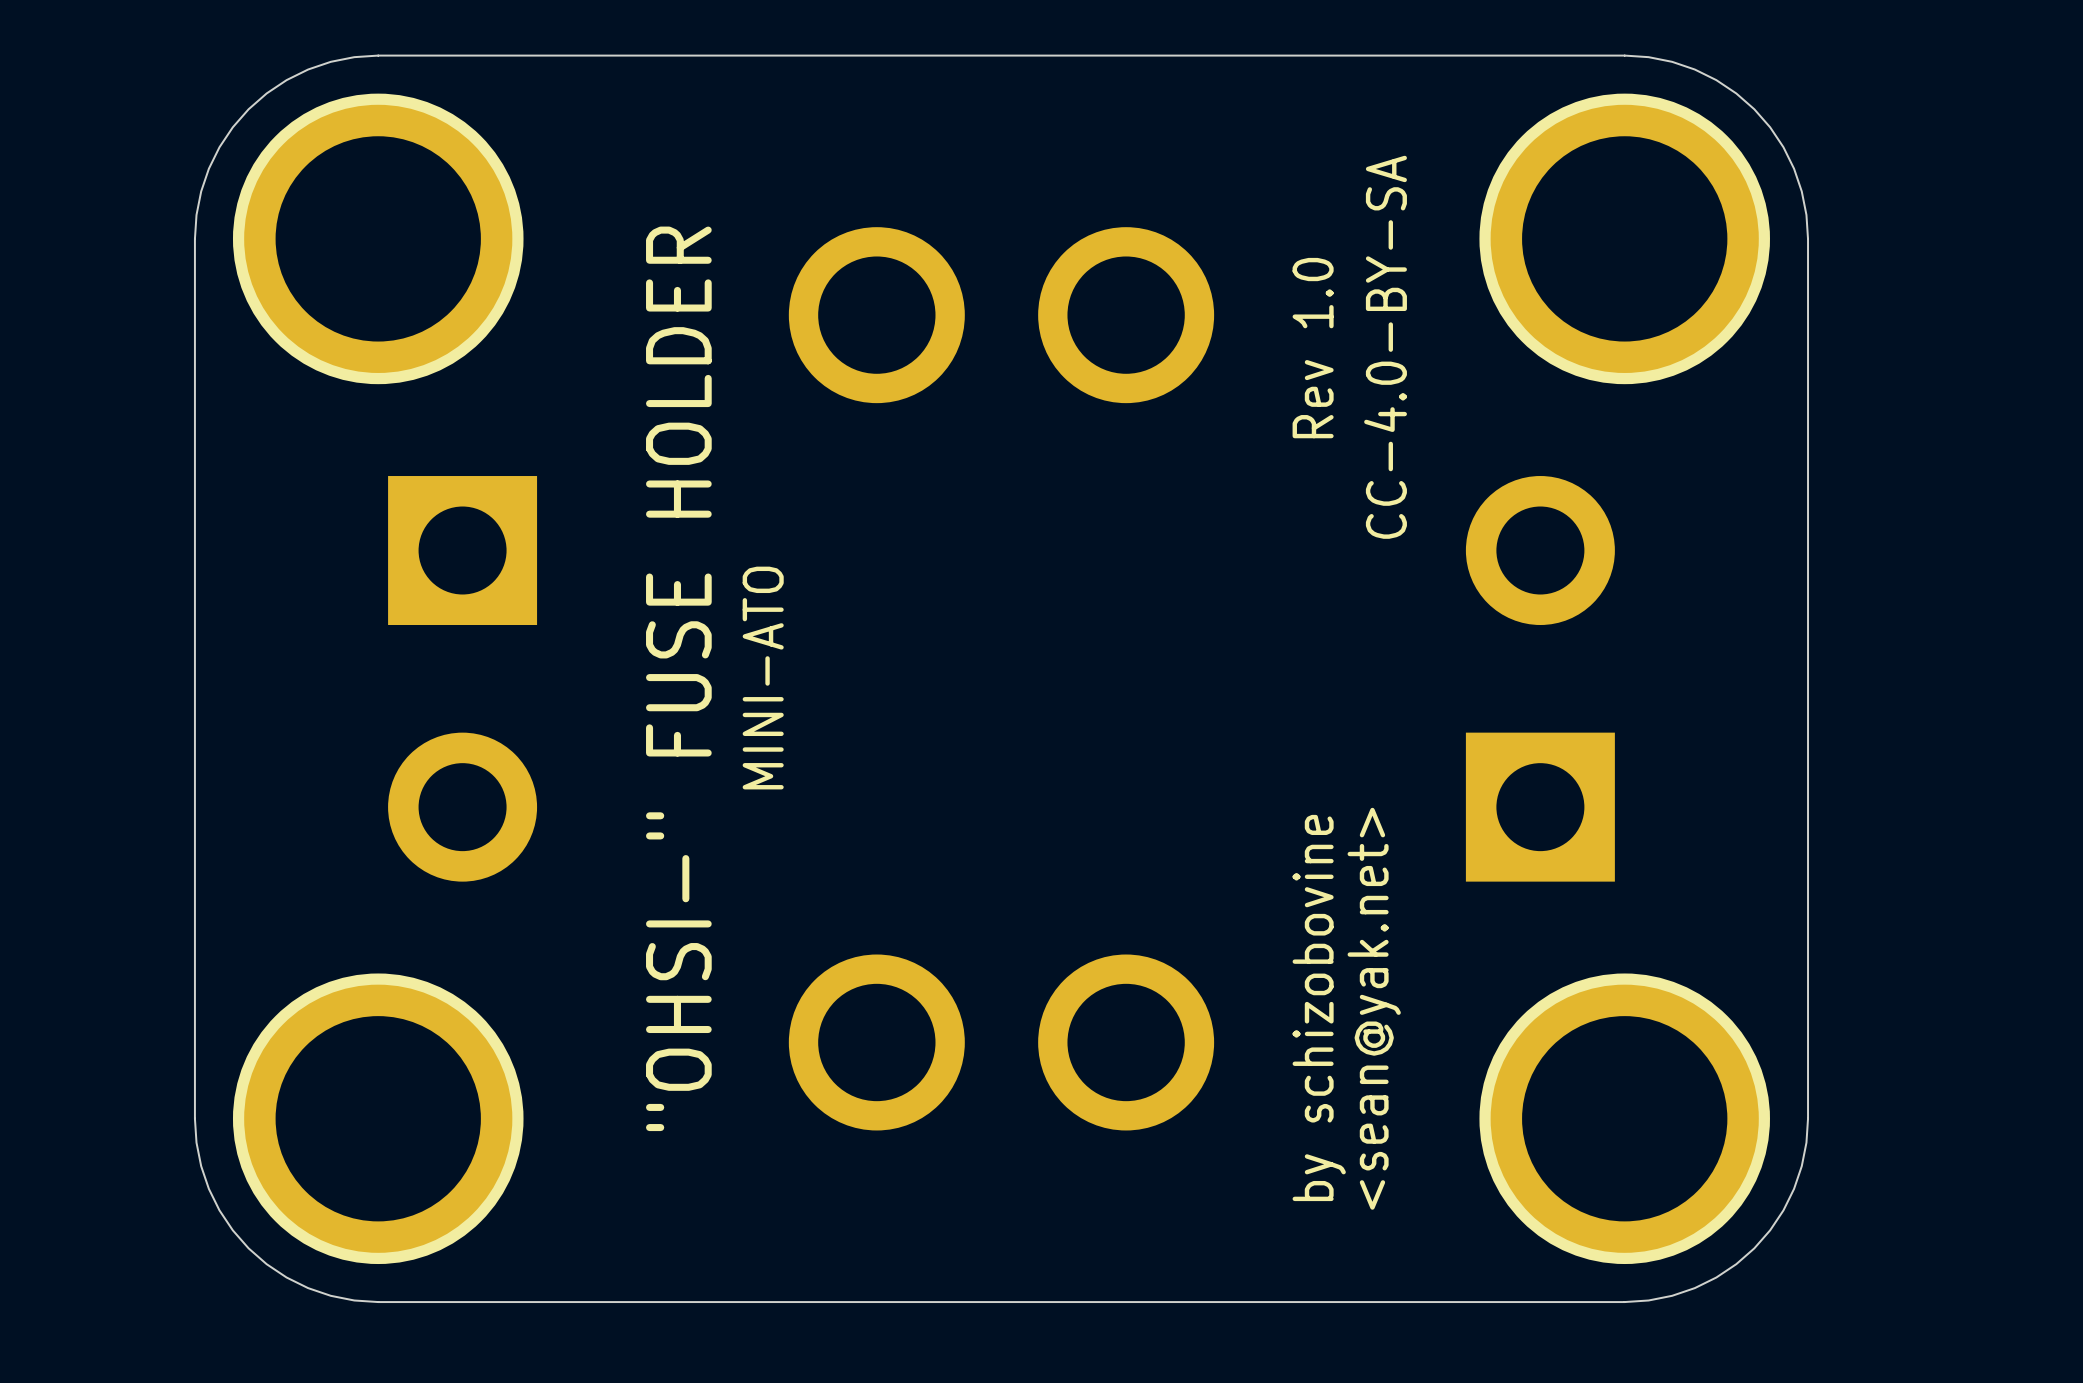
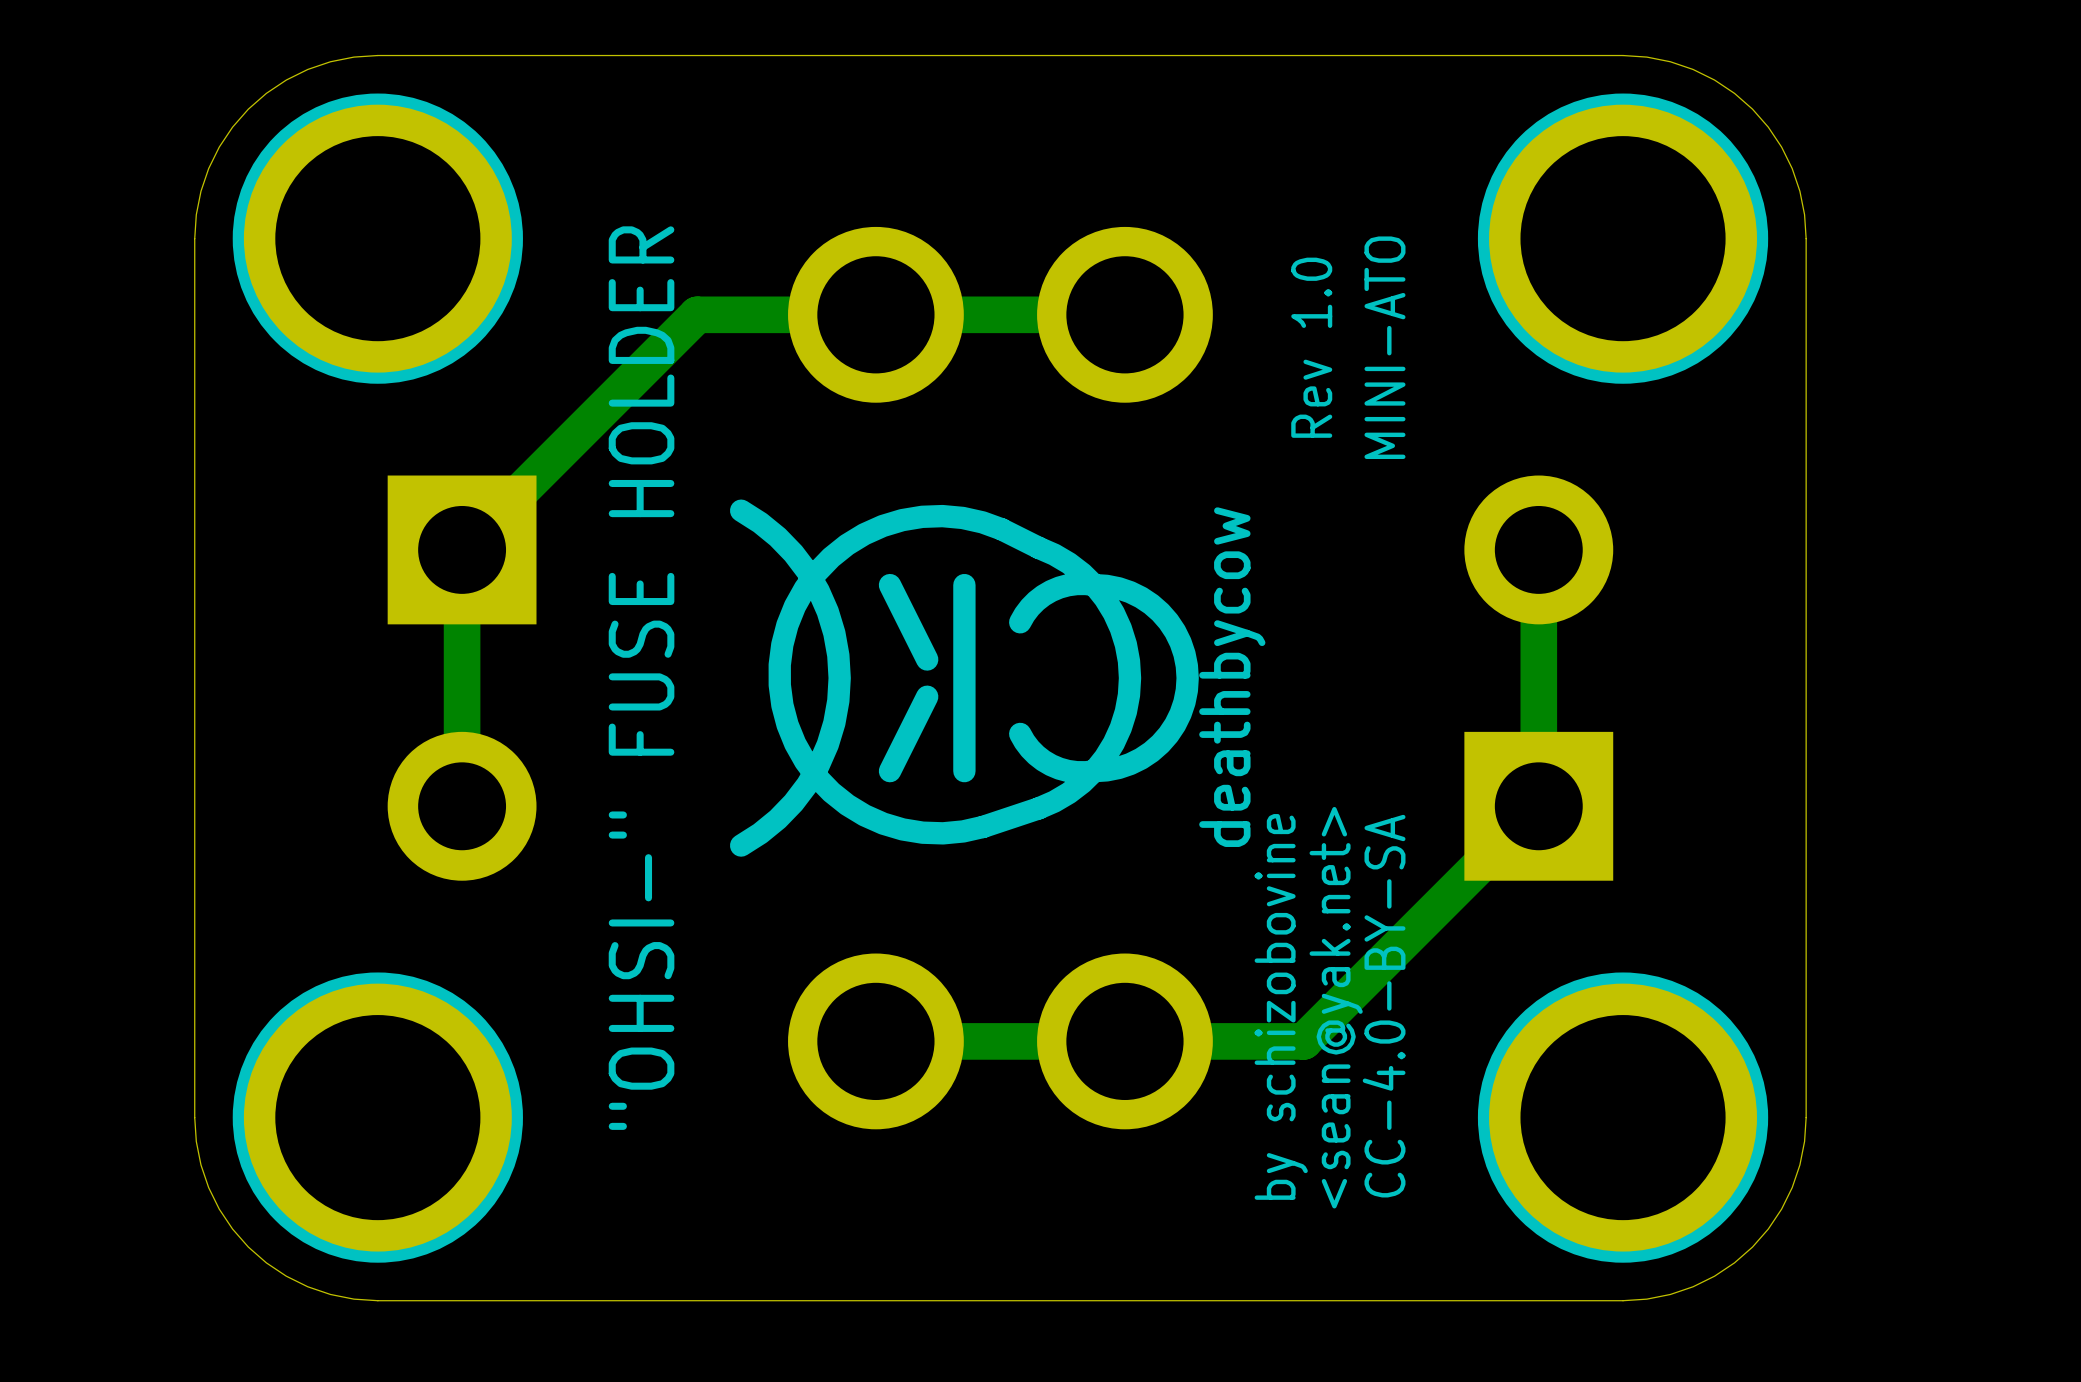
track: none -> (1124, 314) (697, 314) (462, 549) (462, 806)
text: CC-4.0-BY-SA (1385, 347) -> MINI-ATO (1384, 347)
drawing: none -> [729, 499, 1199, 857]
track: none -> (1538, 549) (1538, 806) (1303, 1041) (875, 1041)
text position: "OHSI-" FUSE HOLDER (678, 678) -> "OHSI-" FUSE HOLDER (641, 678)
text: MINI-ATO (763, 678) -> none
text position: by schizobovine (1319, 1007) -> by schizobovine (1281, 1006)
text: none -> CC-4.0-BY-SA (1384, 1006)
text position: <sean@yak.net> (1374, 1008) -> <sean@yak.net> (1336, 1007)

